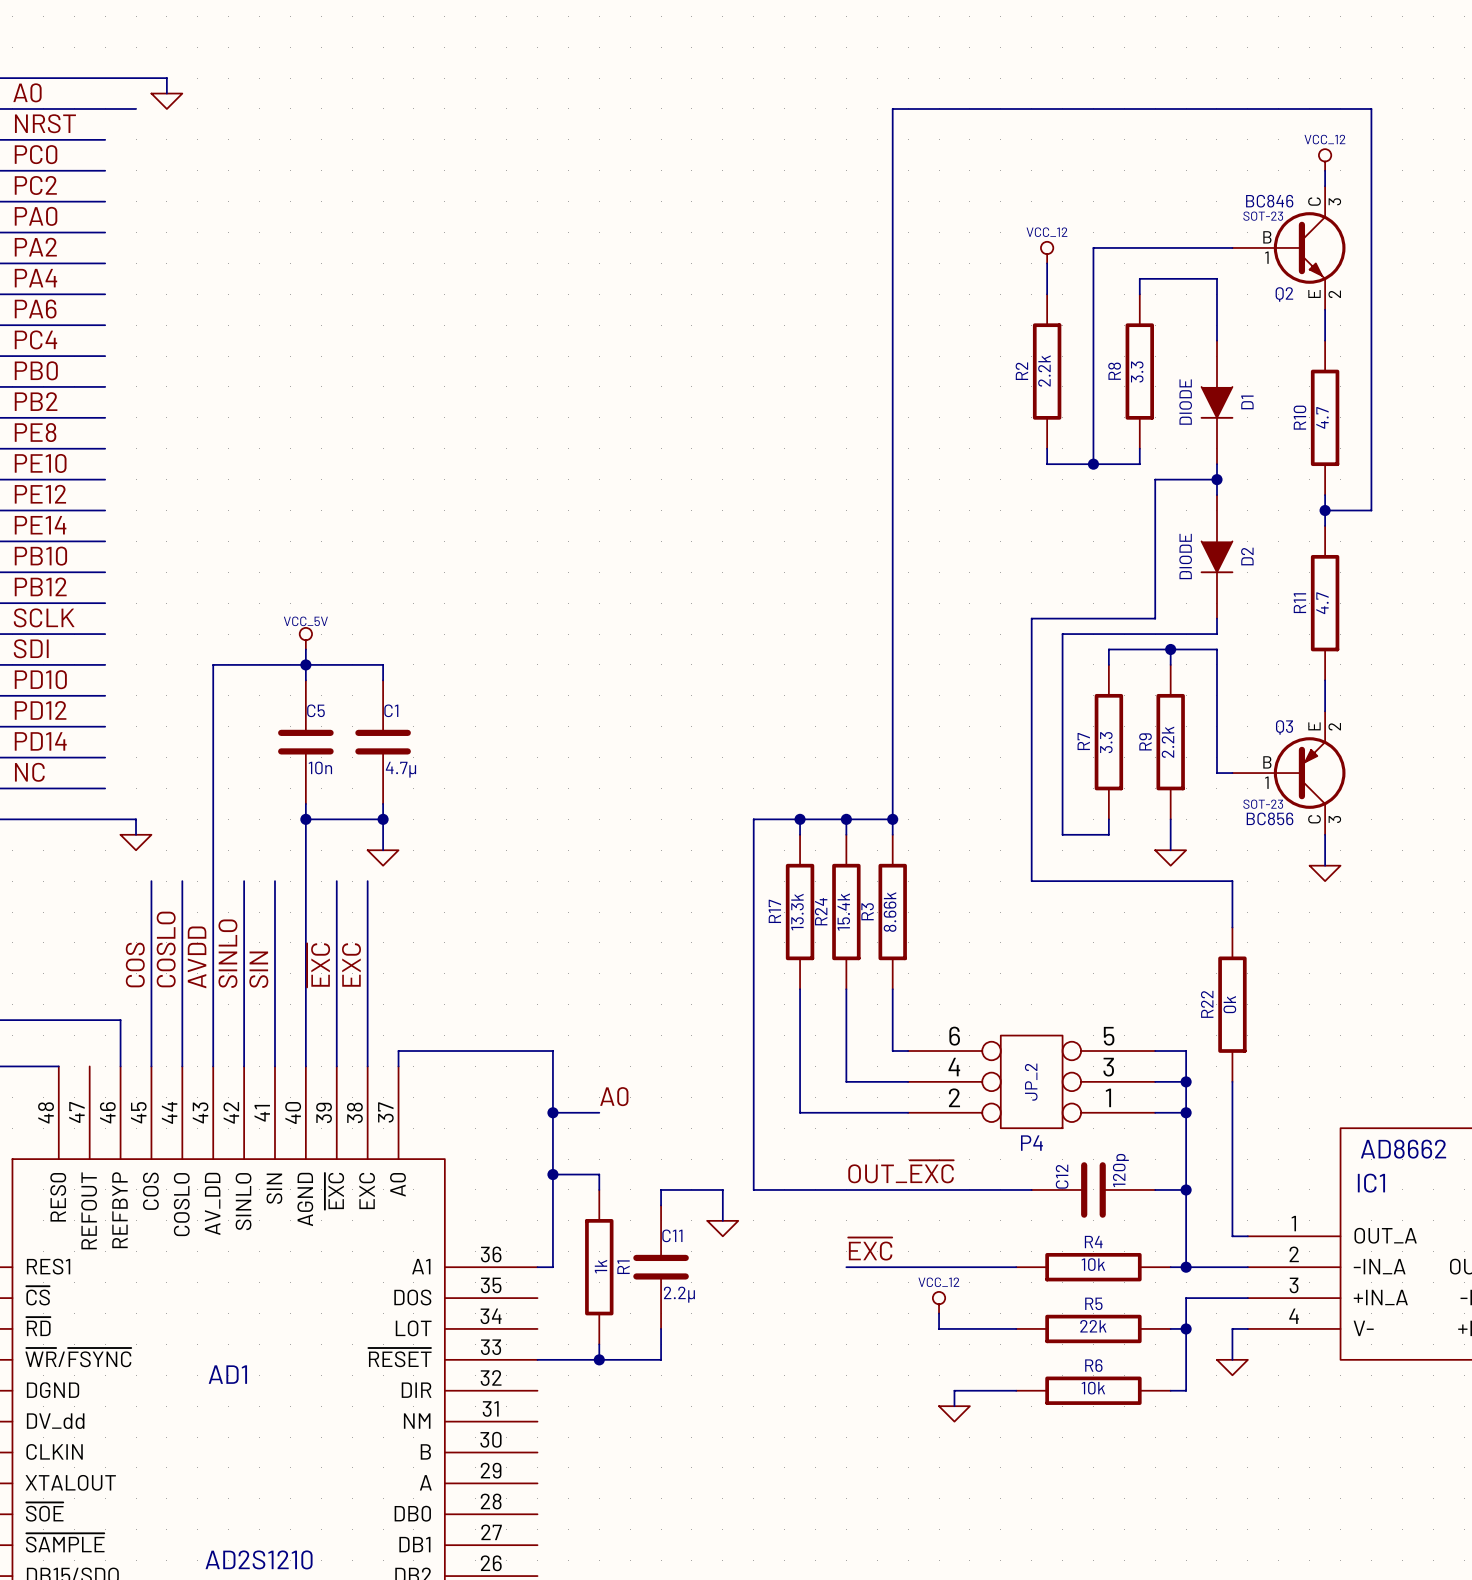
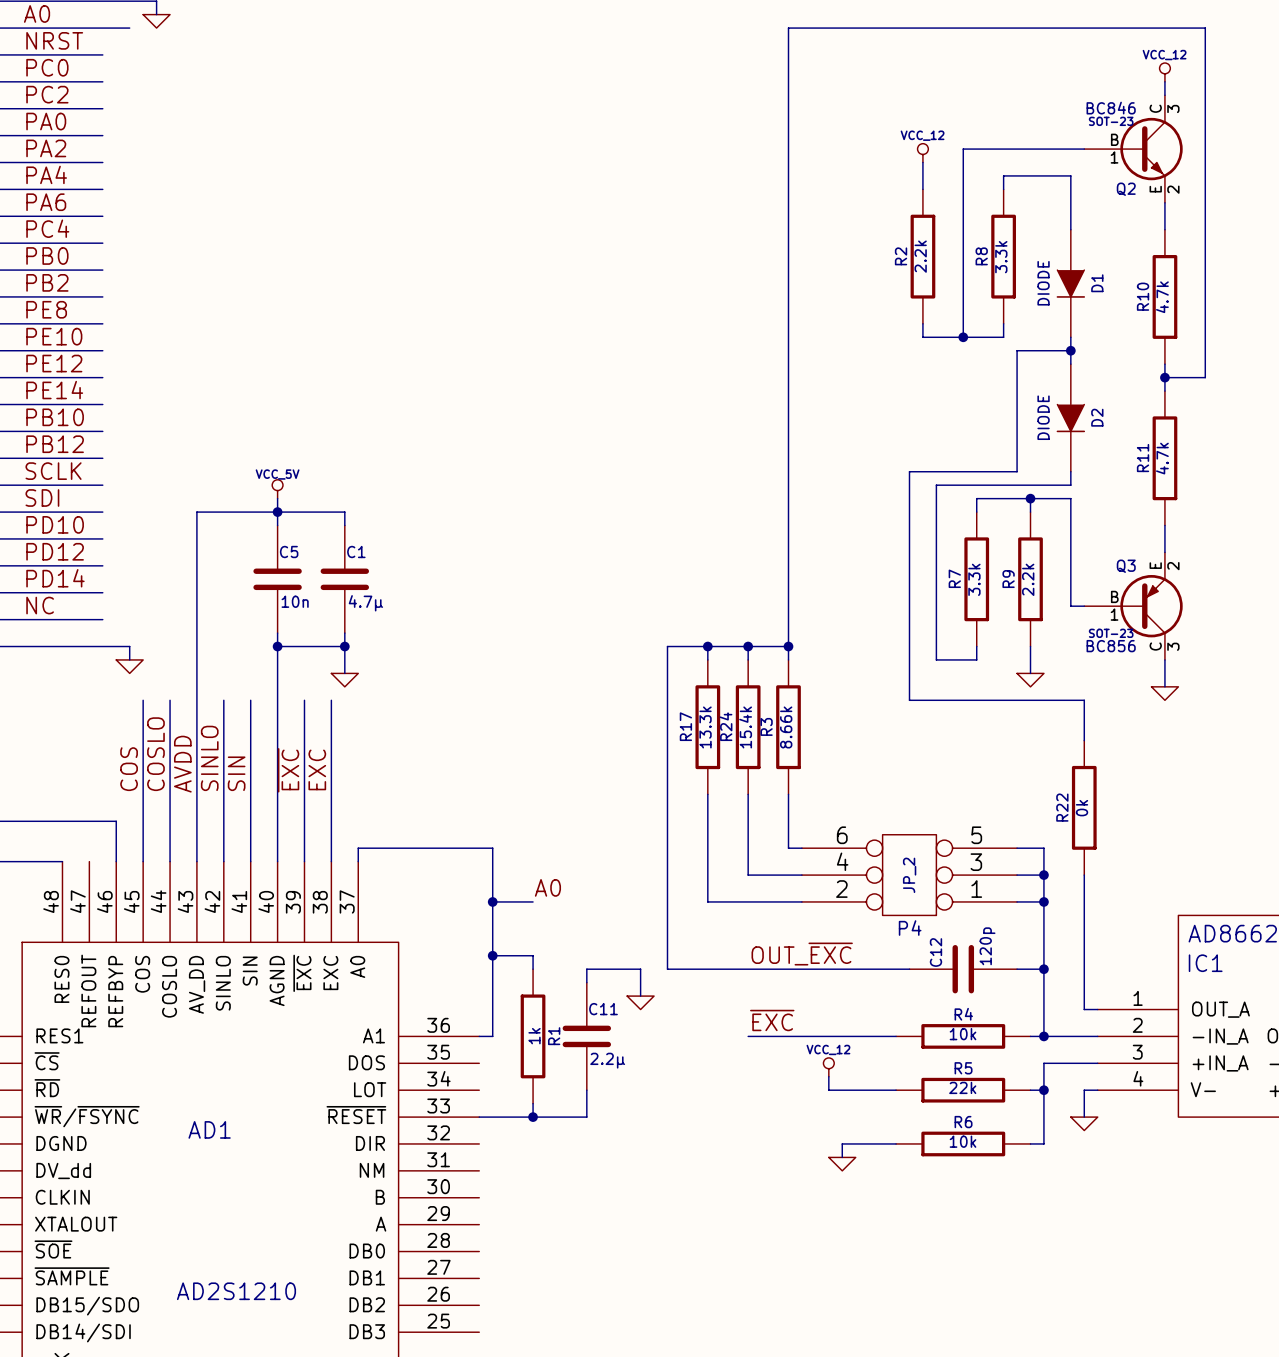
R8 value: 3.3 (1137, 371) -> 3.3k (1001, 257)
R10 value: 4.7 (1322, 417) -> 4.7k (1162, 297)
R11 value: 4.7 (1322, 603) -> 4.7k (1162, 458)
R7 value: 3.3 (1106, 742) -> 3.3k (974, 579)

